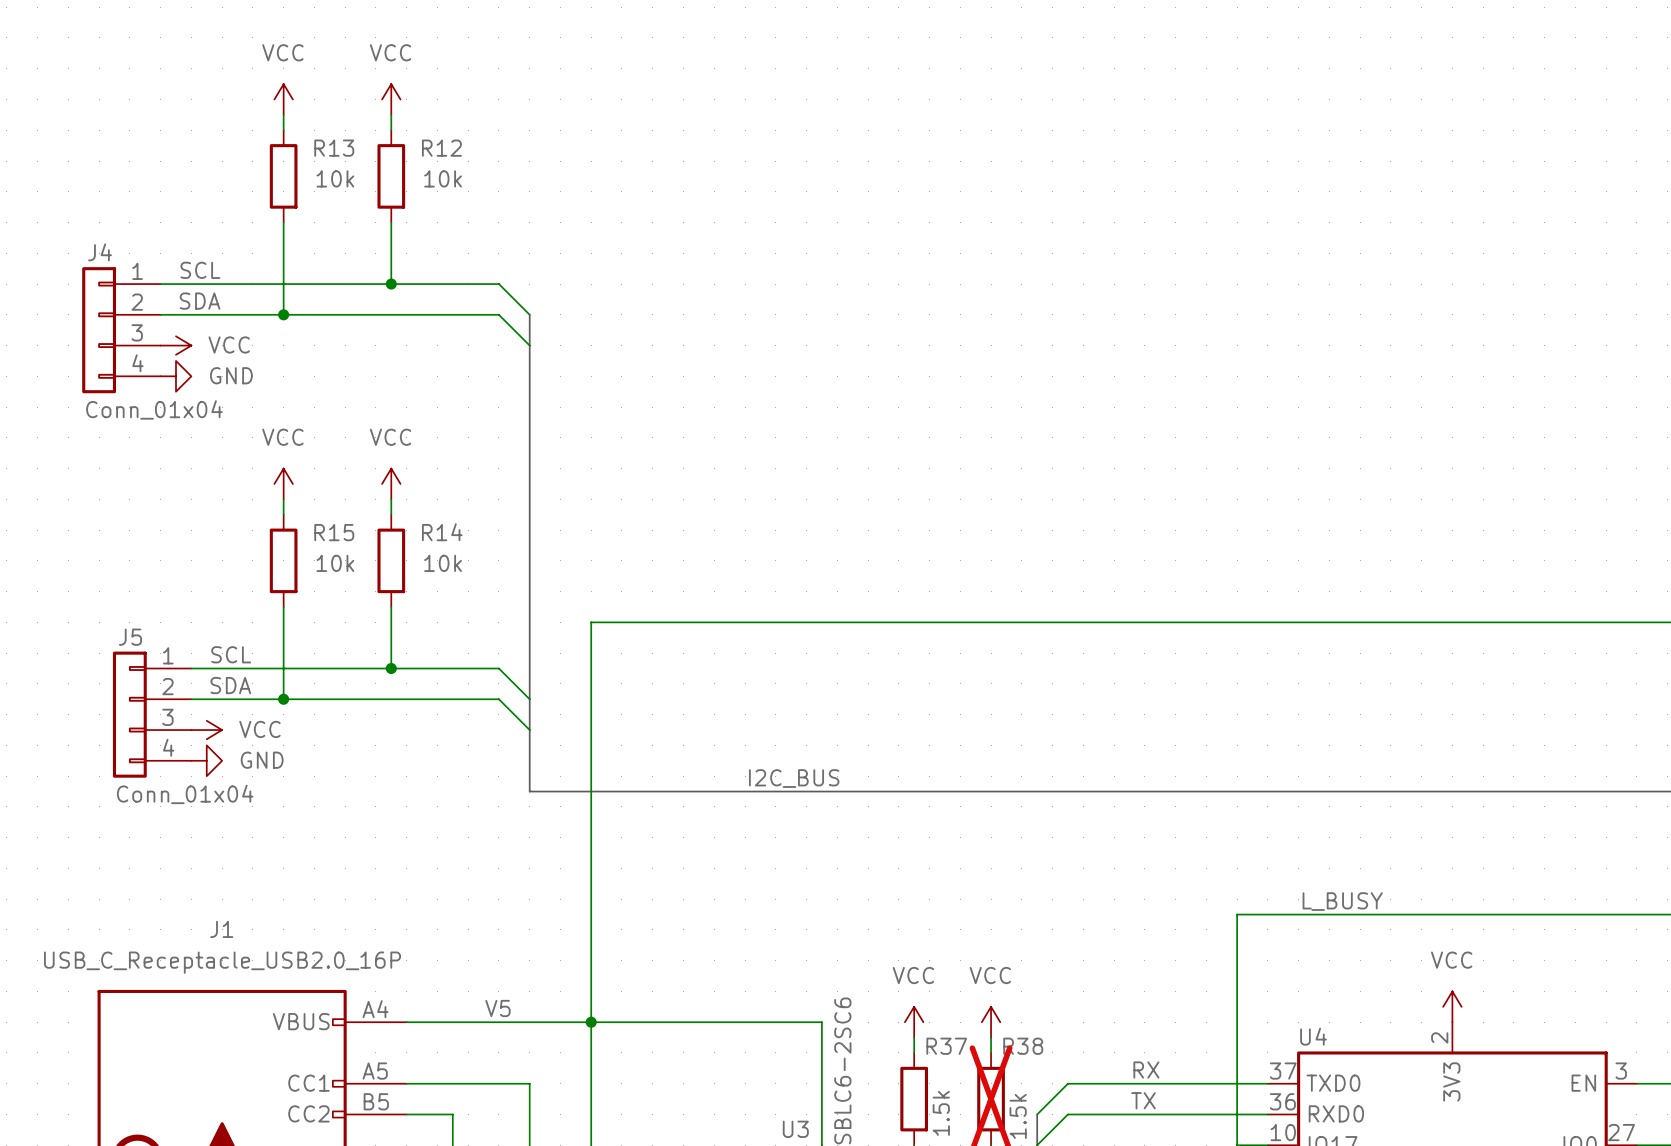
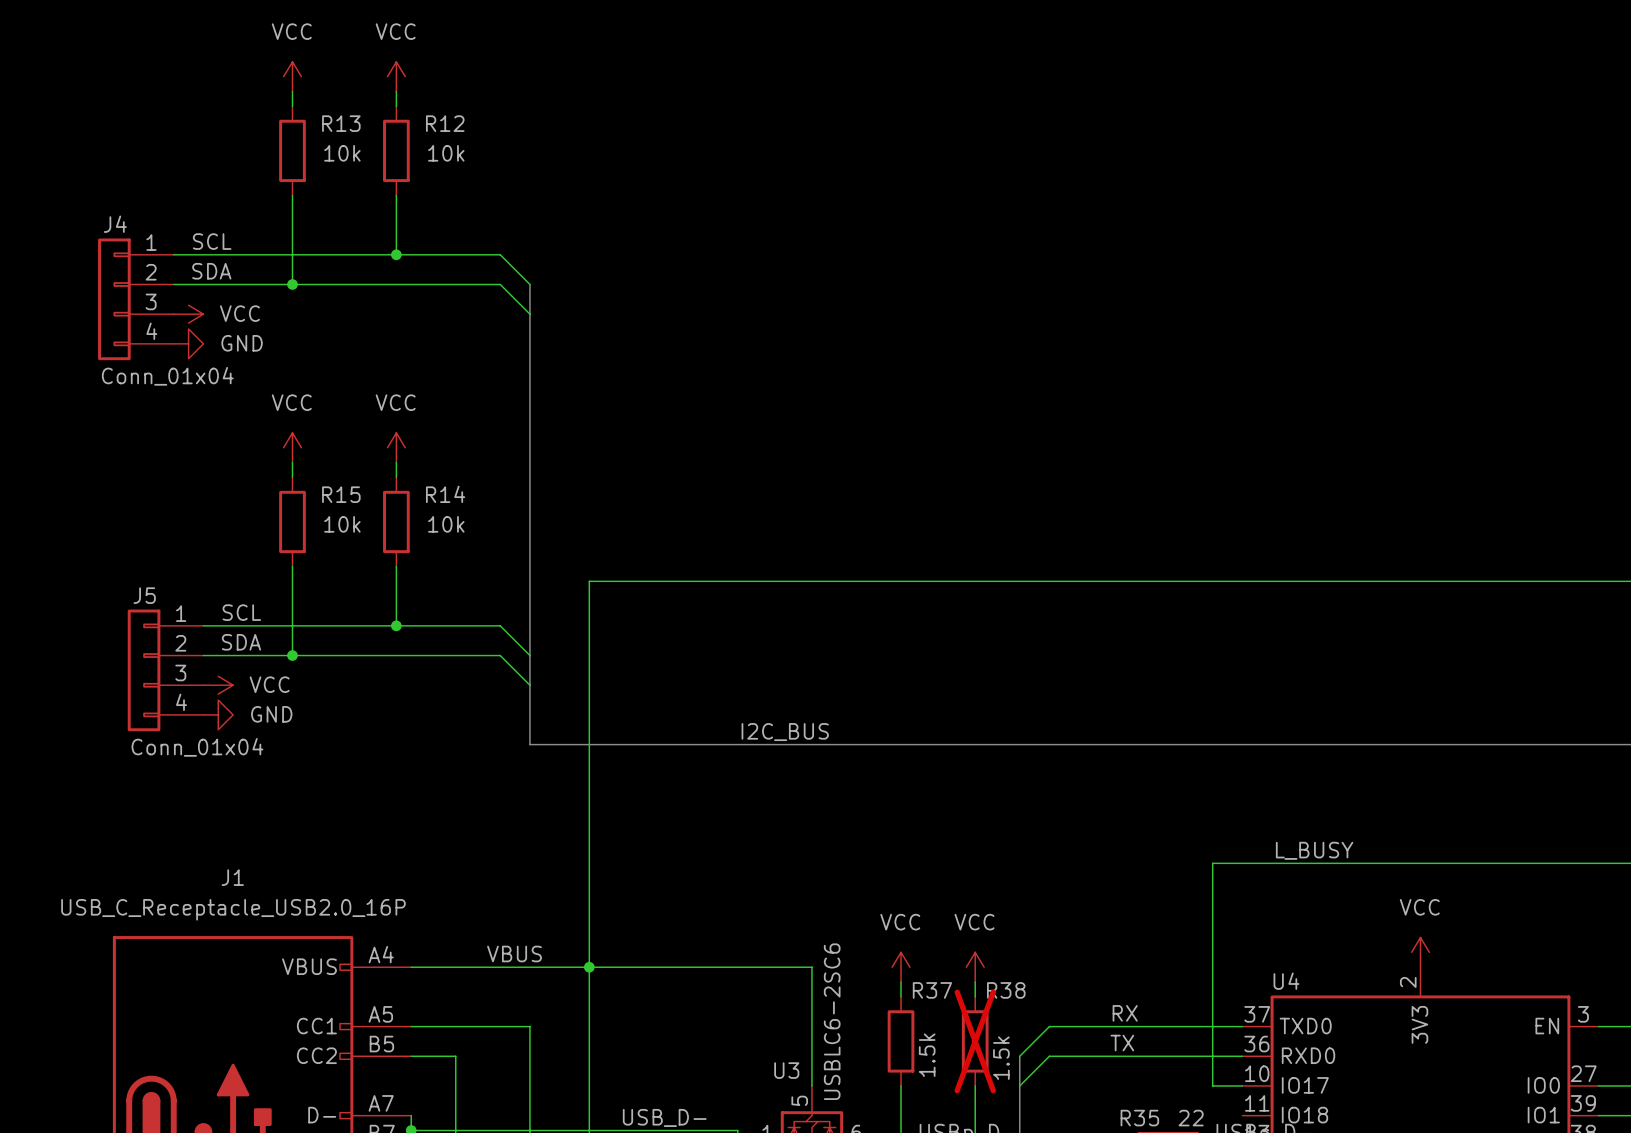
label: V5 (497, 1008) -> VBUS (514, 953)

